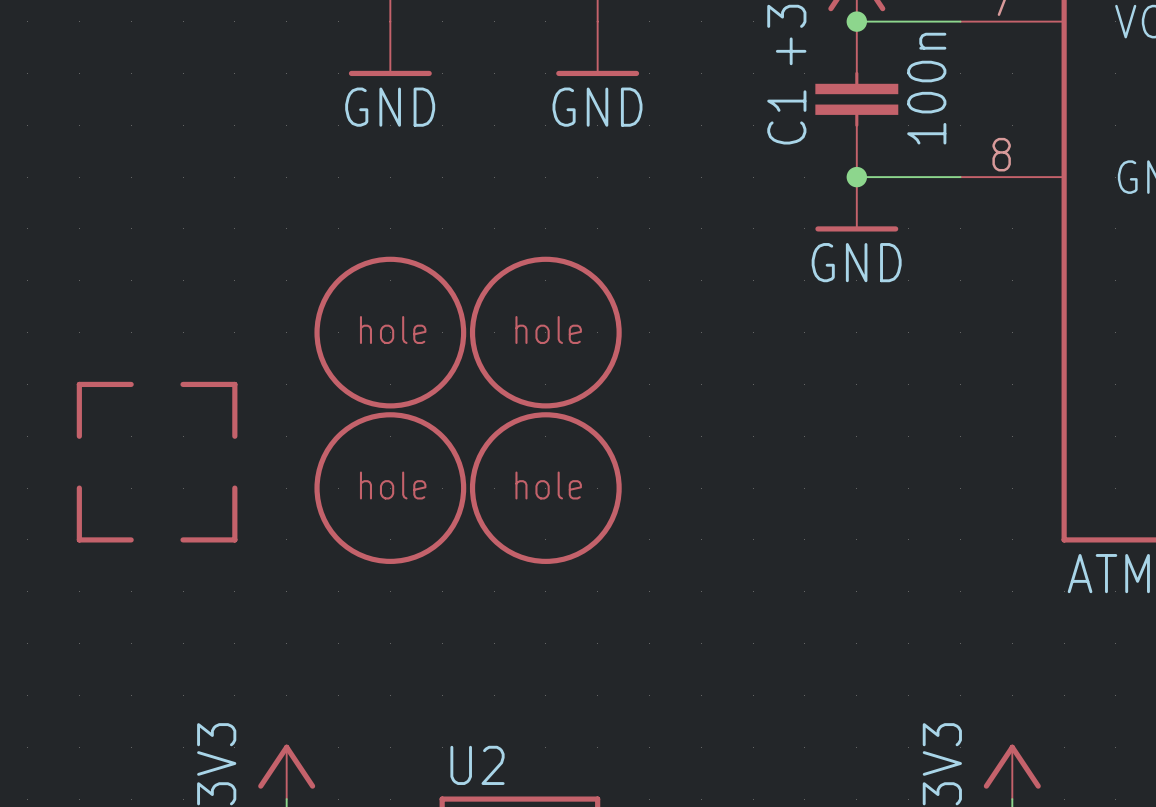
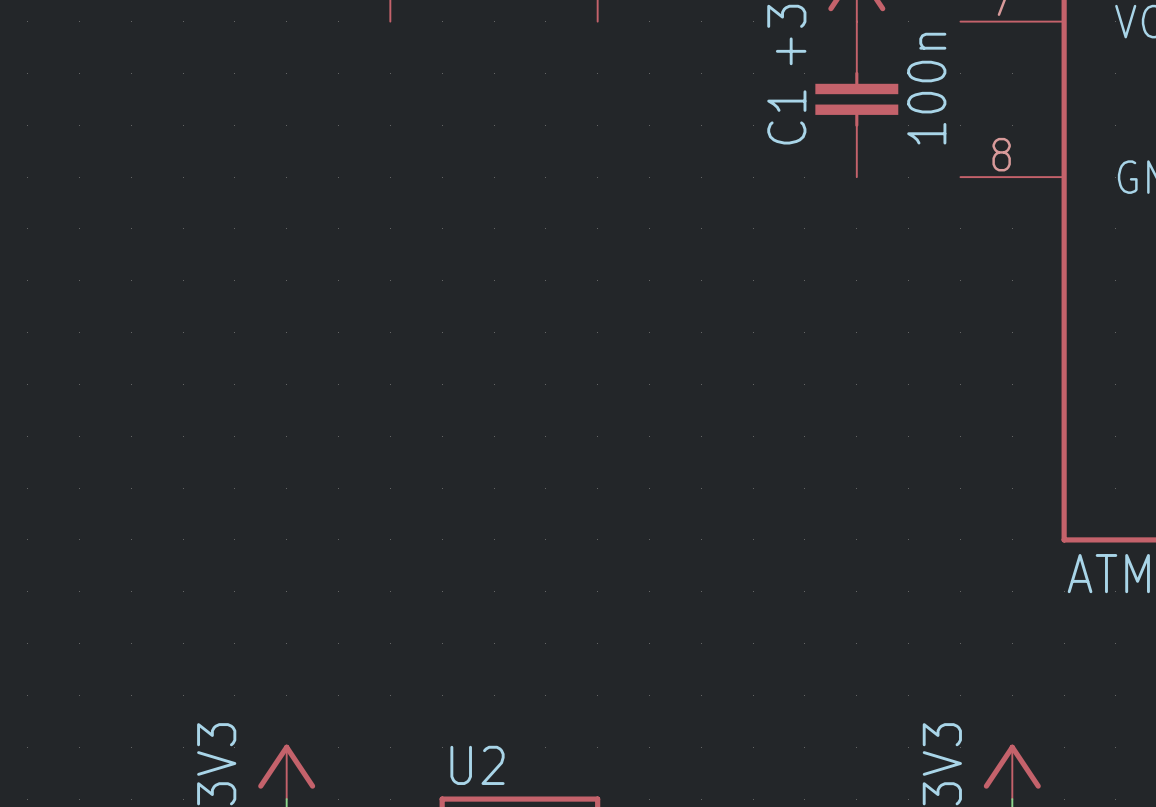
wire: (856, 21) (960, 21) -> none
junction: (856, 21) -> none
power symbol: GND (390, 48) -> none
power symbol: GND (597, 48) -> none
wire: (856, 177) (960, 177) -> none
junction: (856, 177) -> none
power symbol: GND (856, 204) -> none
part: (390, 332) -> none
part: (545, 332) -> none
part: (105, 410) -> none
part: (208, 410) -> none
part: (390, 488) -> none
part: (545, 488) -> none
part: (105, 514) -> none
part: (208, 514) -> none

